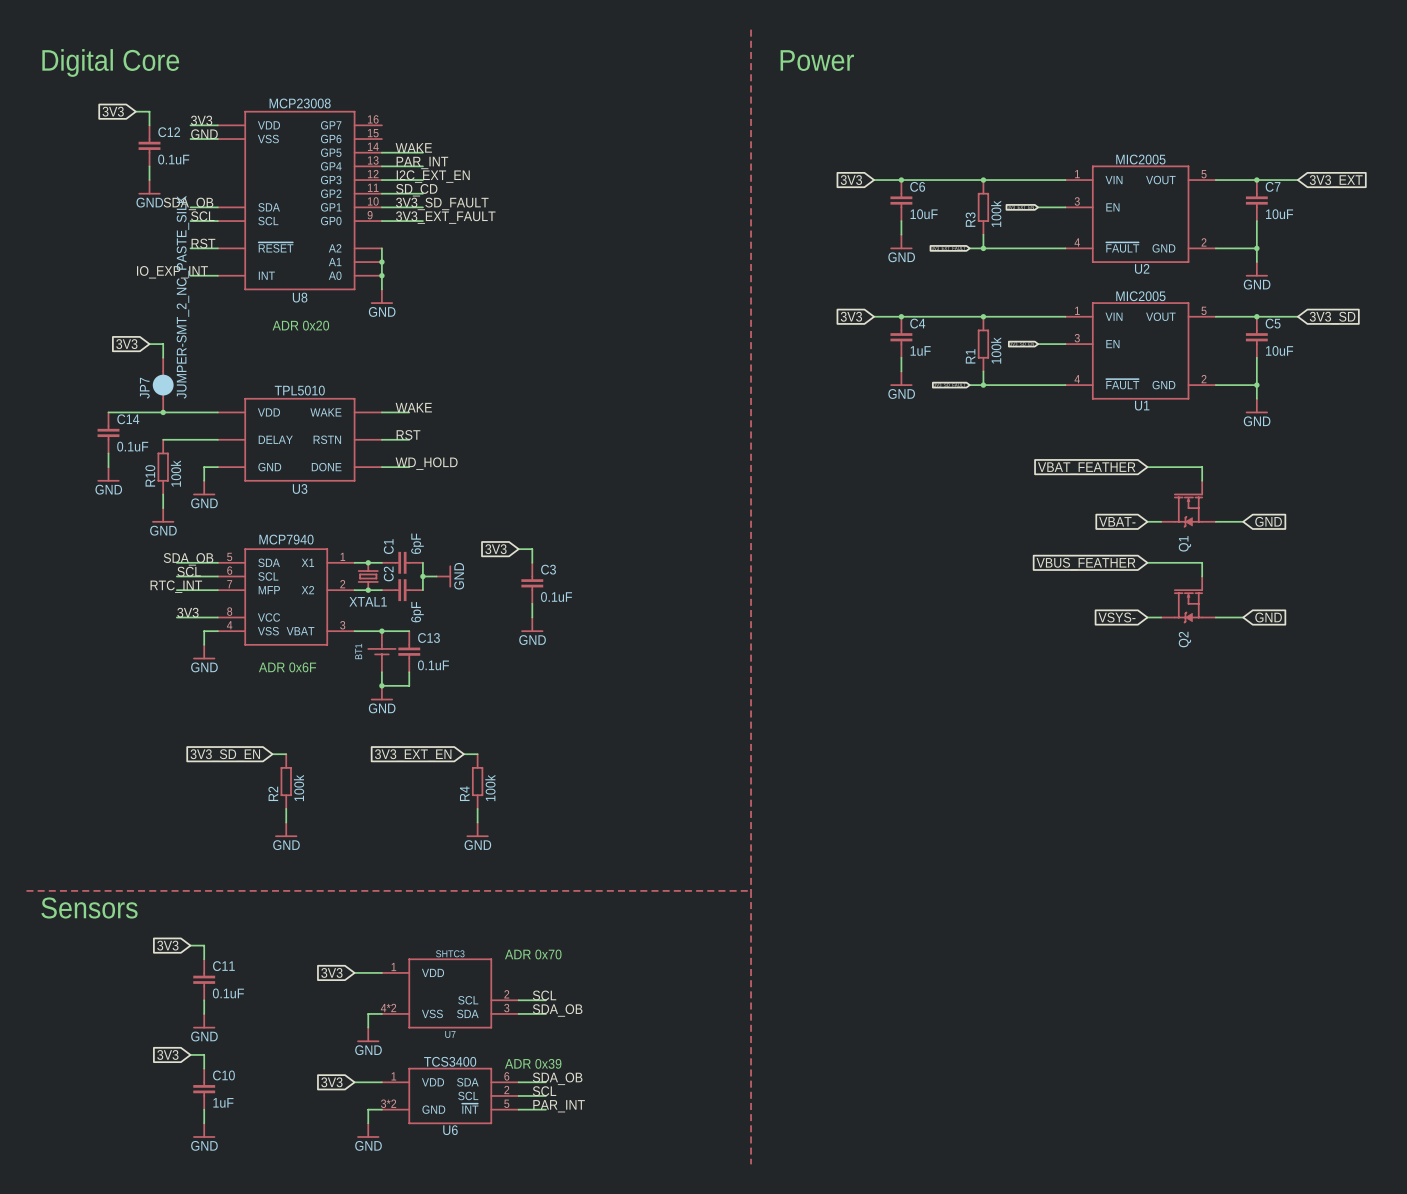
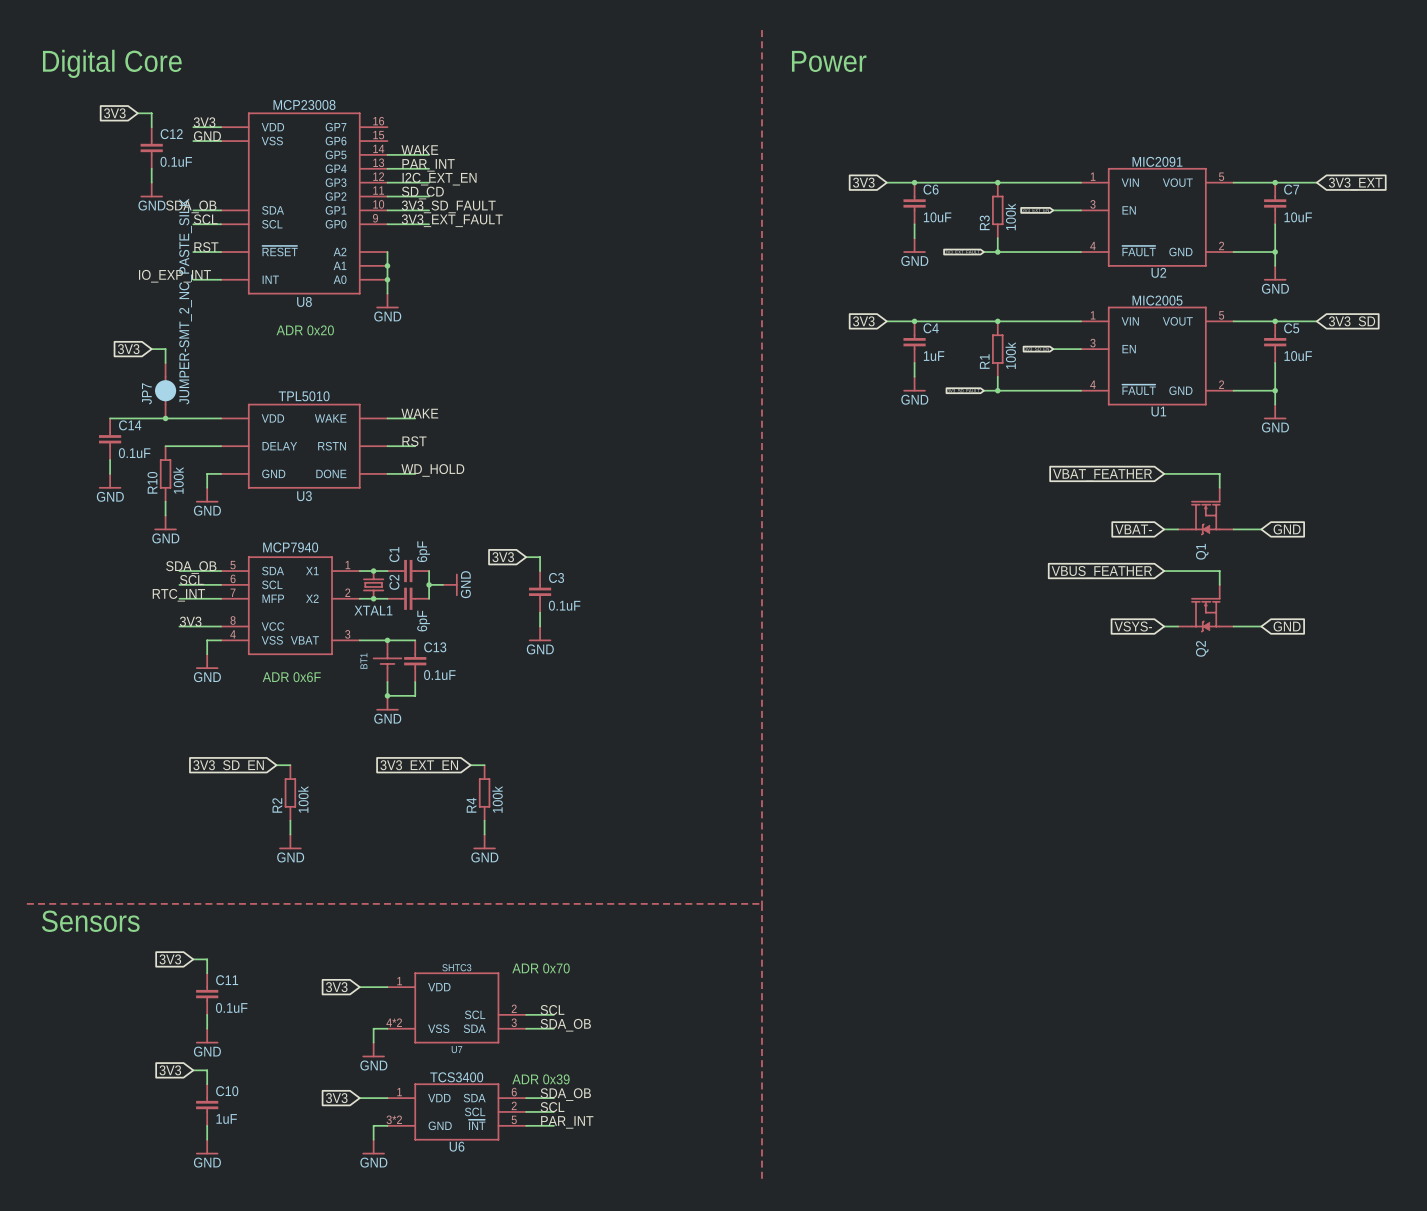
U2 text: MIC2005 (1140, 159) -> MIC2091 (1157, 161)

